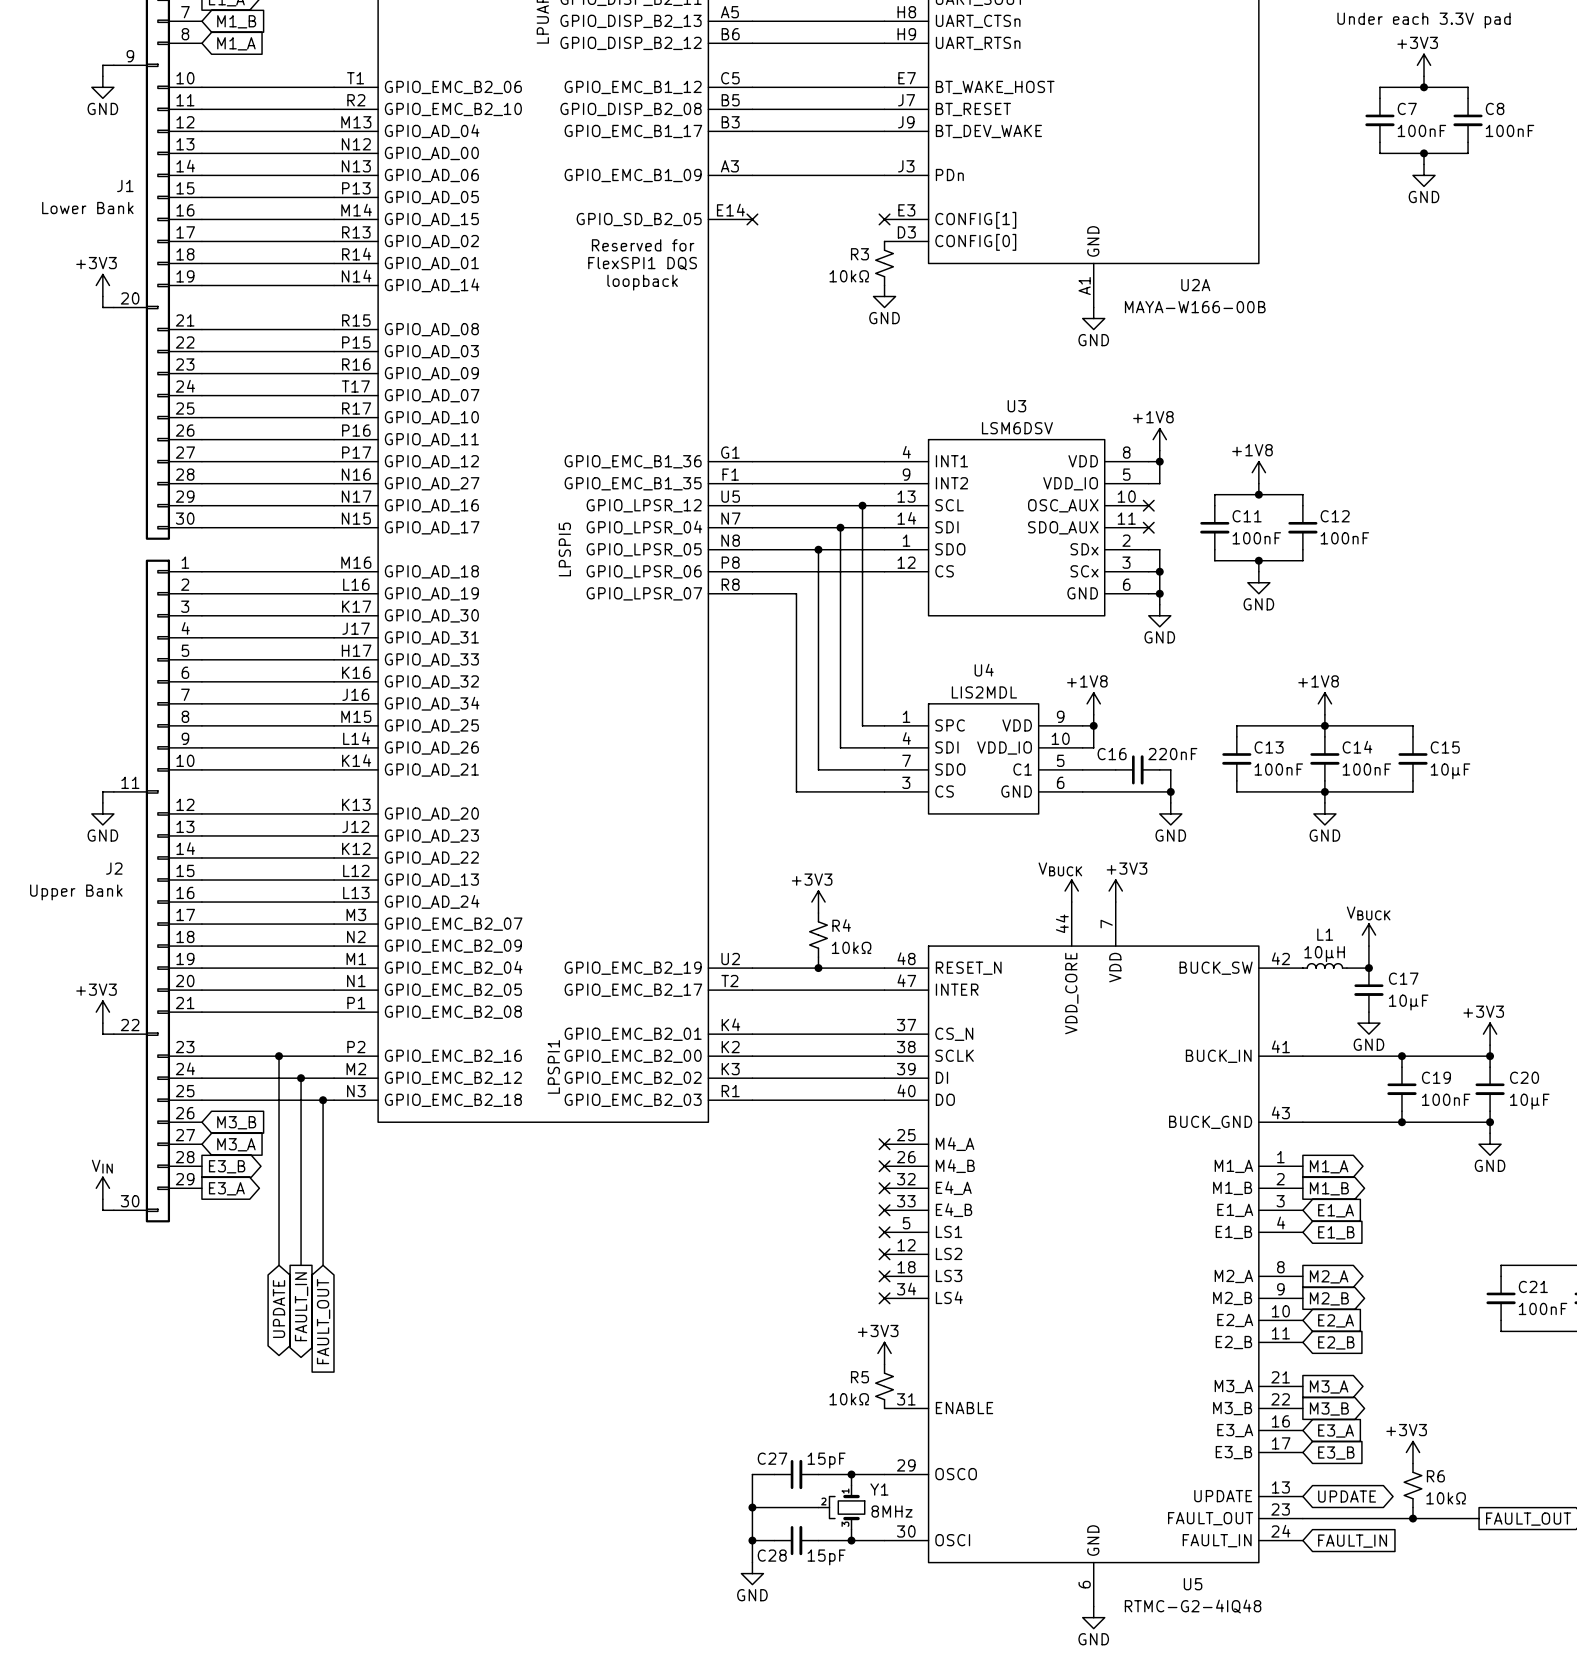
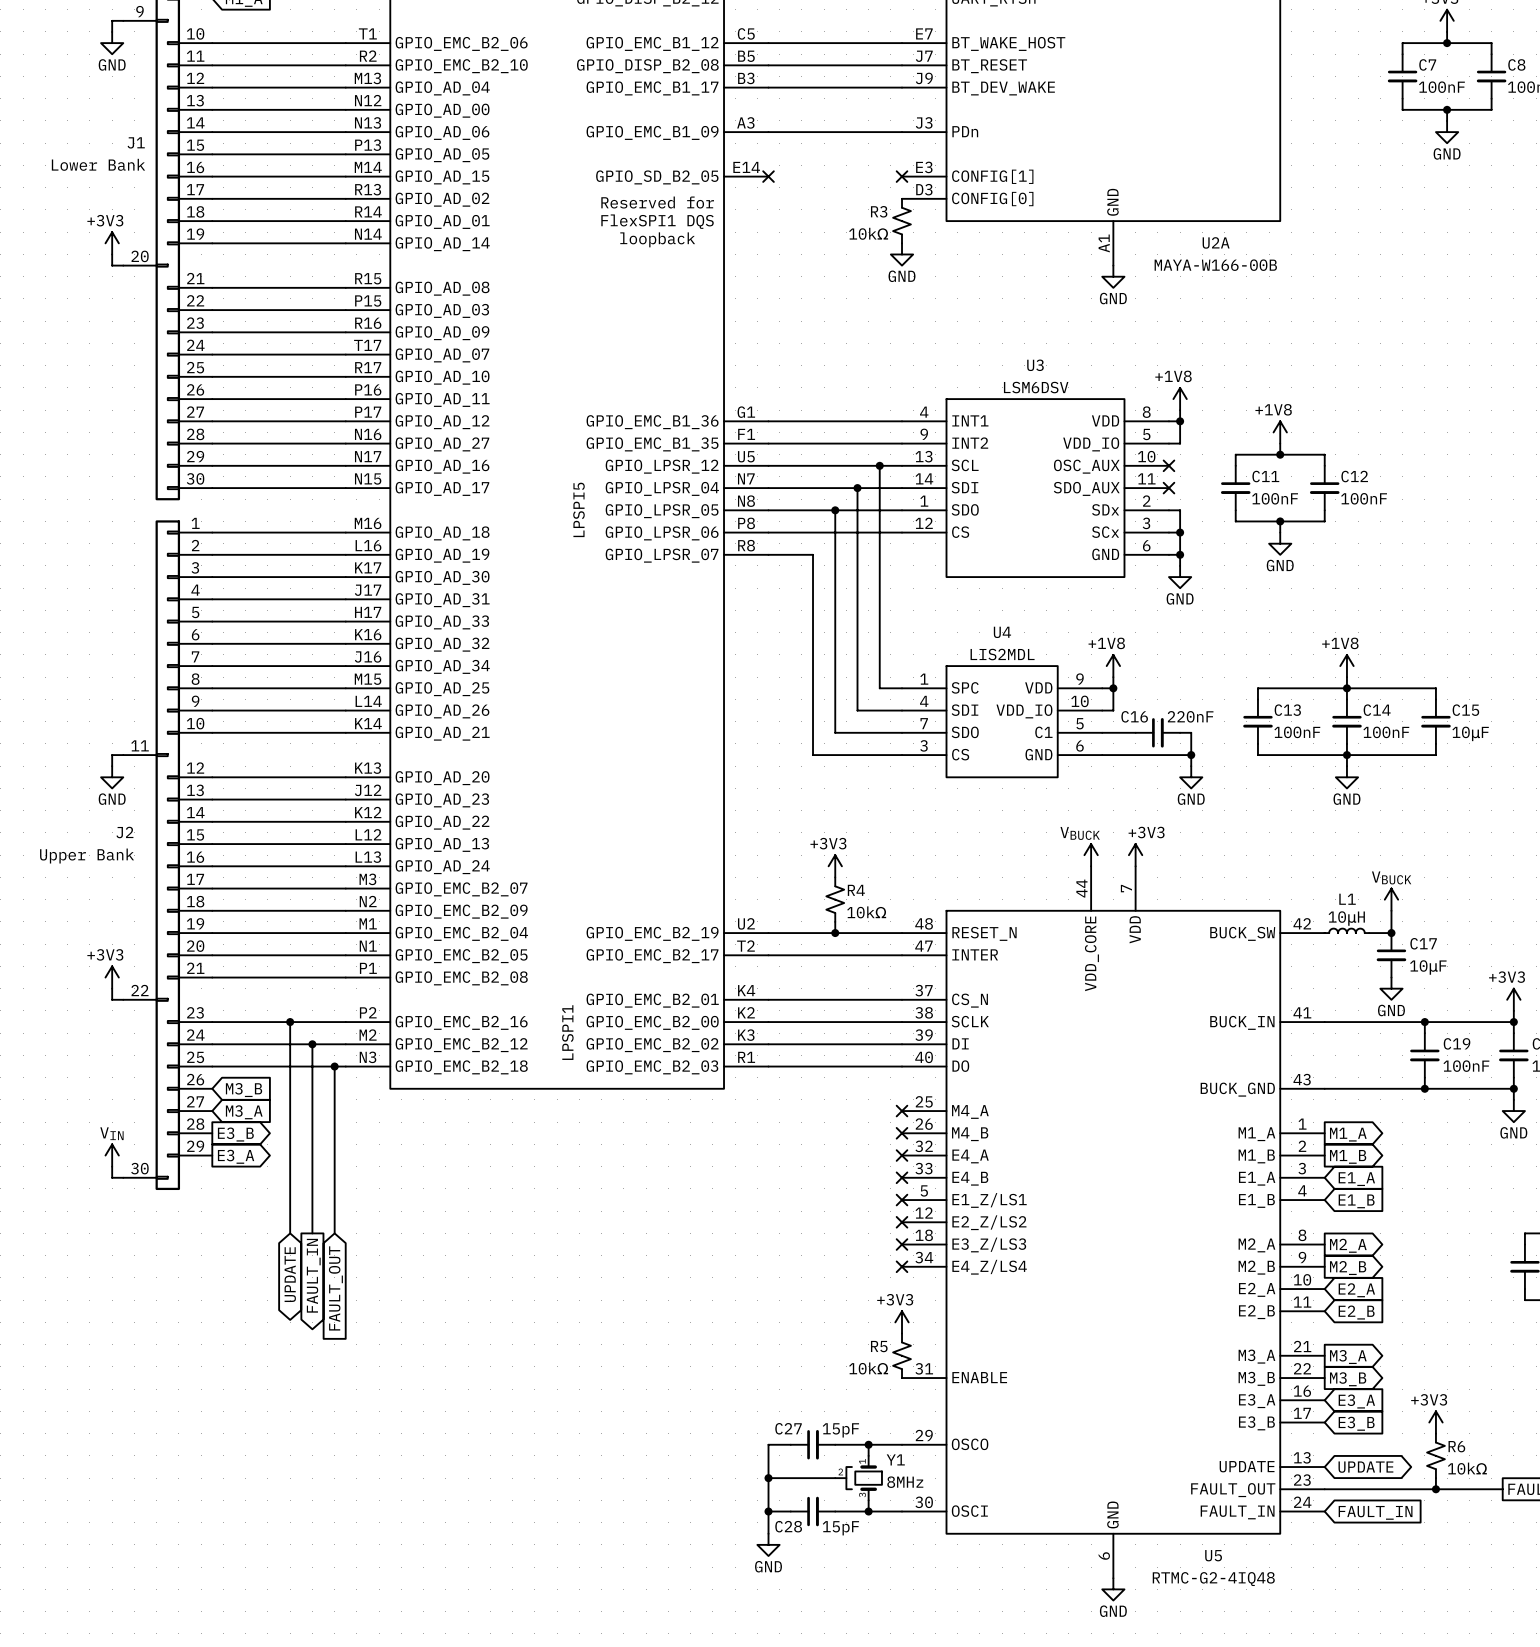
U5 pin name: LS1 (949, 1231) -> E1_Z/LS1 (989, 1200)
U5 pin name: LS2 (949, 1253) -> E2_Z/LS2 (989, 1222)
U5 pin name: LS3 (949, 1275) -> E3_Z/LS3 (989, 1244)
U5 pin name: LS4 (949, 1297) -> E4_Z/LS4 (989, 1267)

